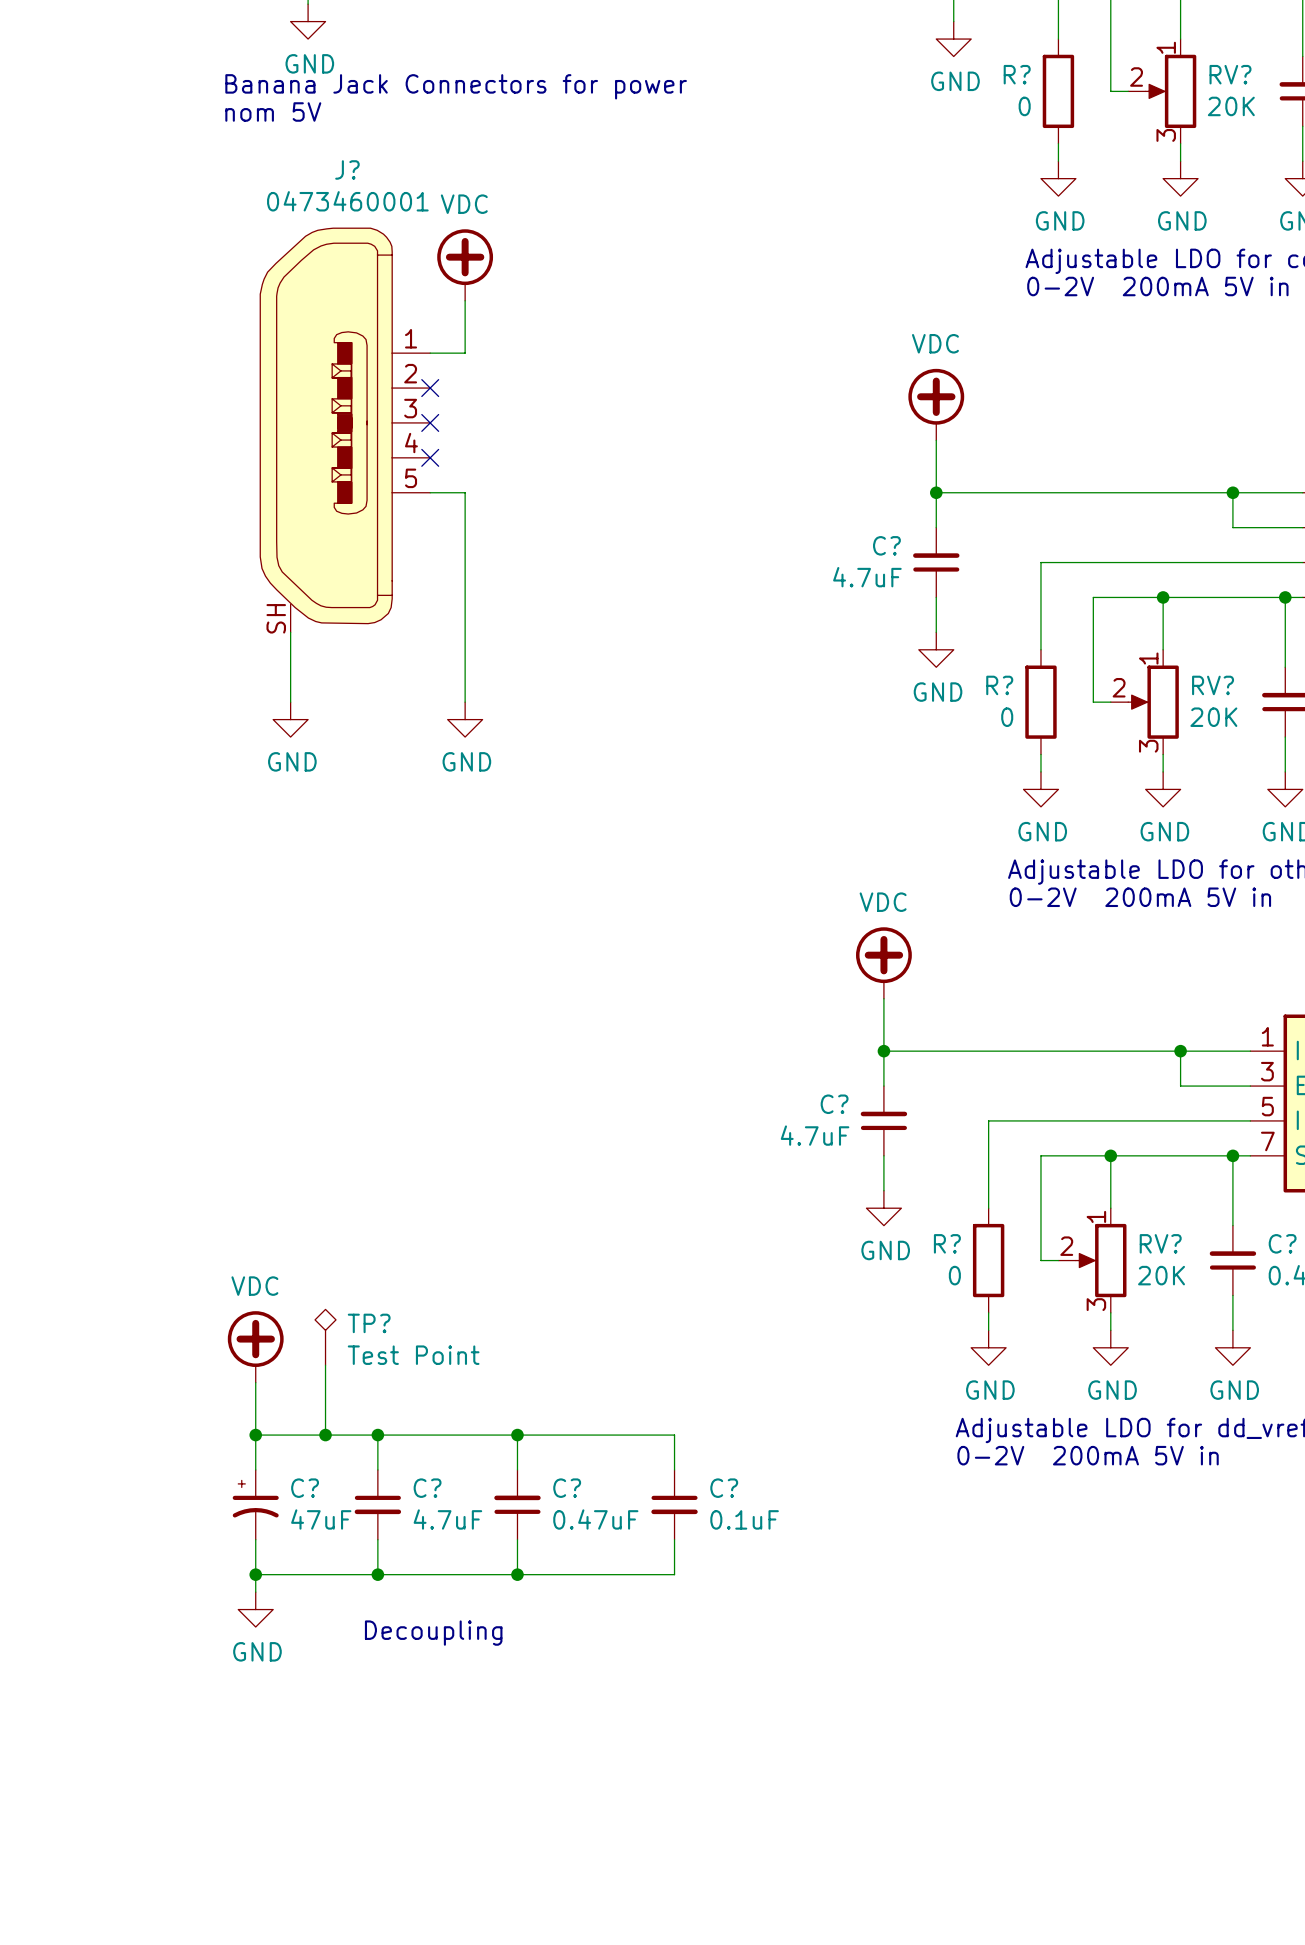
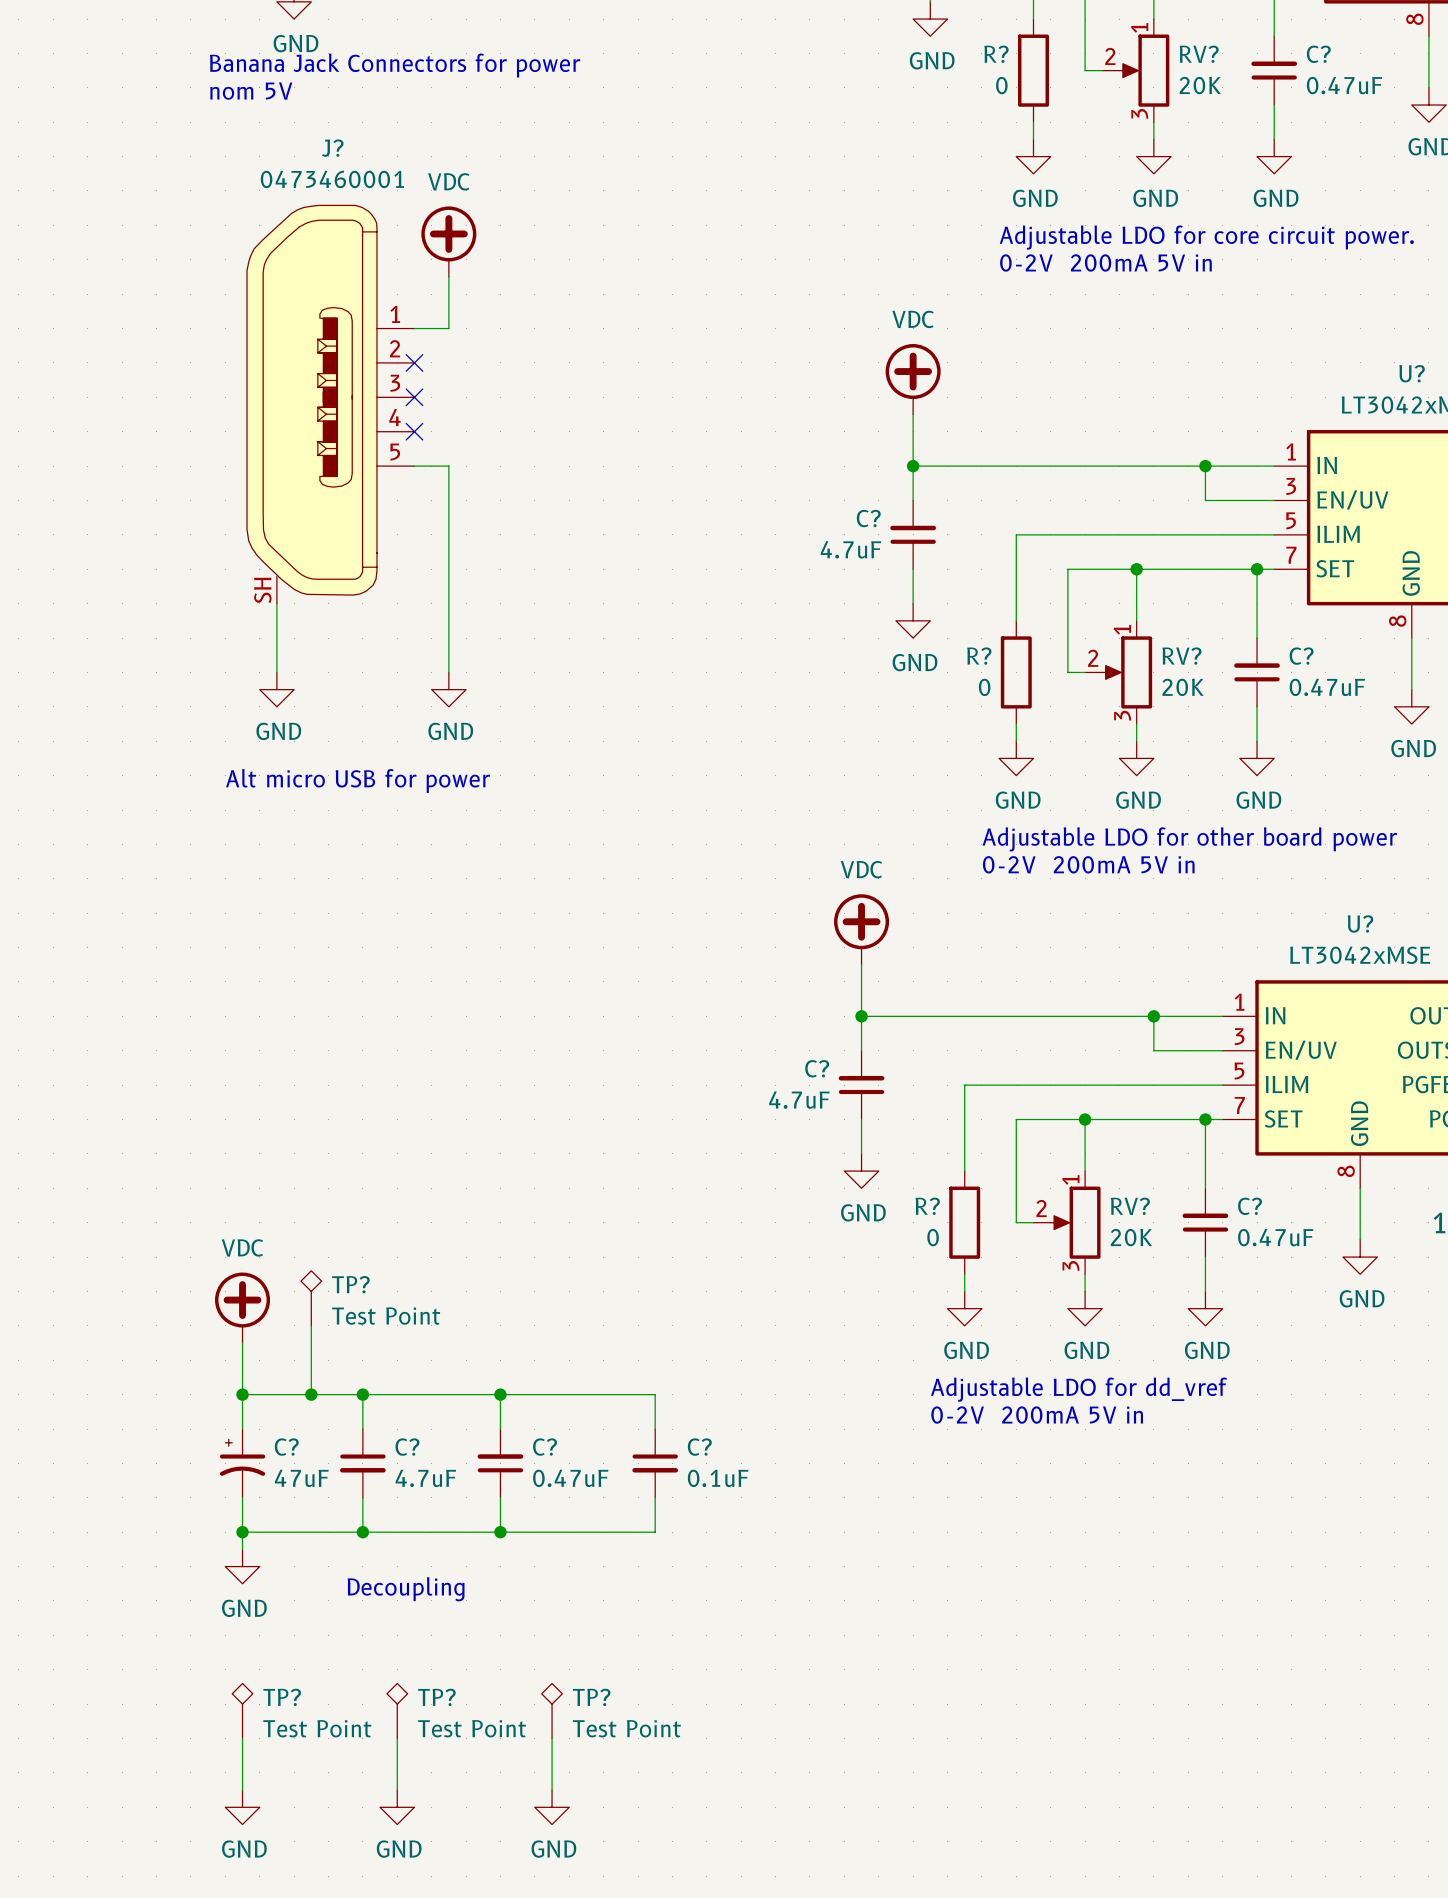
text: none -> Alt micro USB for power (358, 780)
TP?: none -> Test Point (242, 1711)
TP?: none -> Test Point (397, 1711)
TP?: none -> Test Point (552, 1711)
wire: none -> (242, 1738) (242, 1790)
wire: none -> (397, 1738) (397, 1790)
wire: none -> (552, 1738) (552, 1790)
power symbol: none -> GND (242, 1807)
power symbol: none -> GND (397, 1807)
power symbol: none -> GND (552, 1807)

